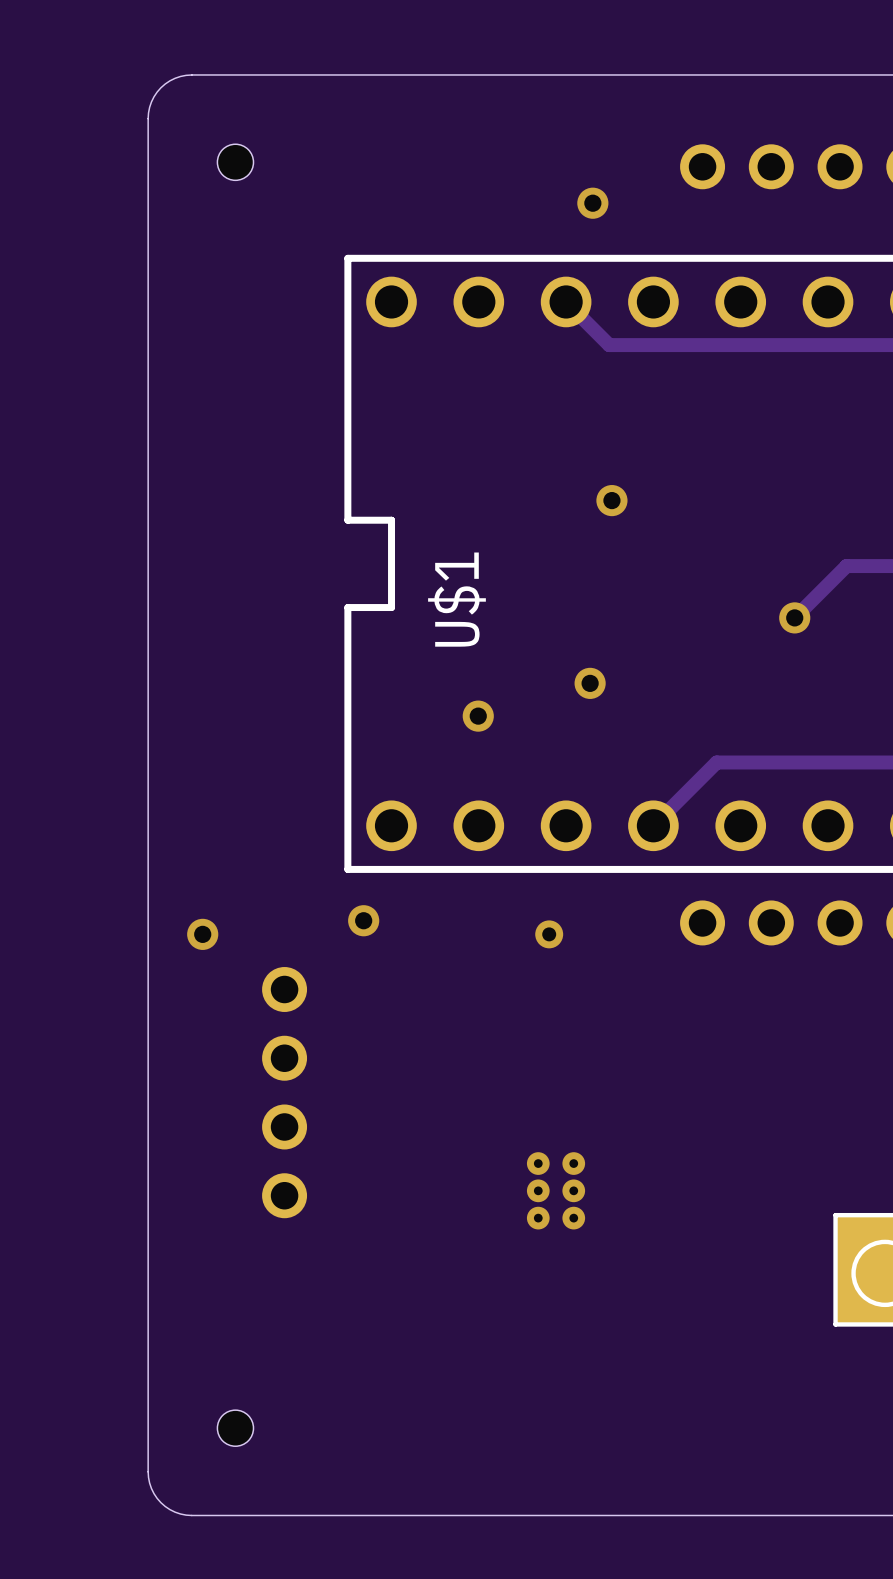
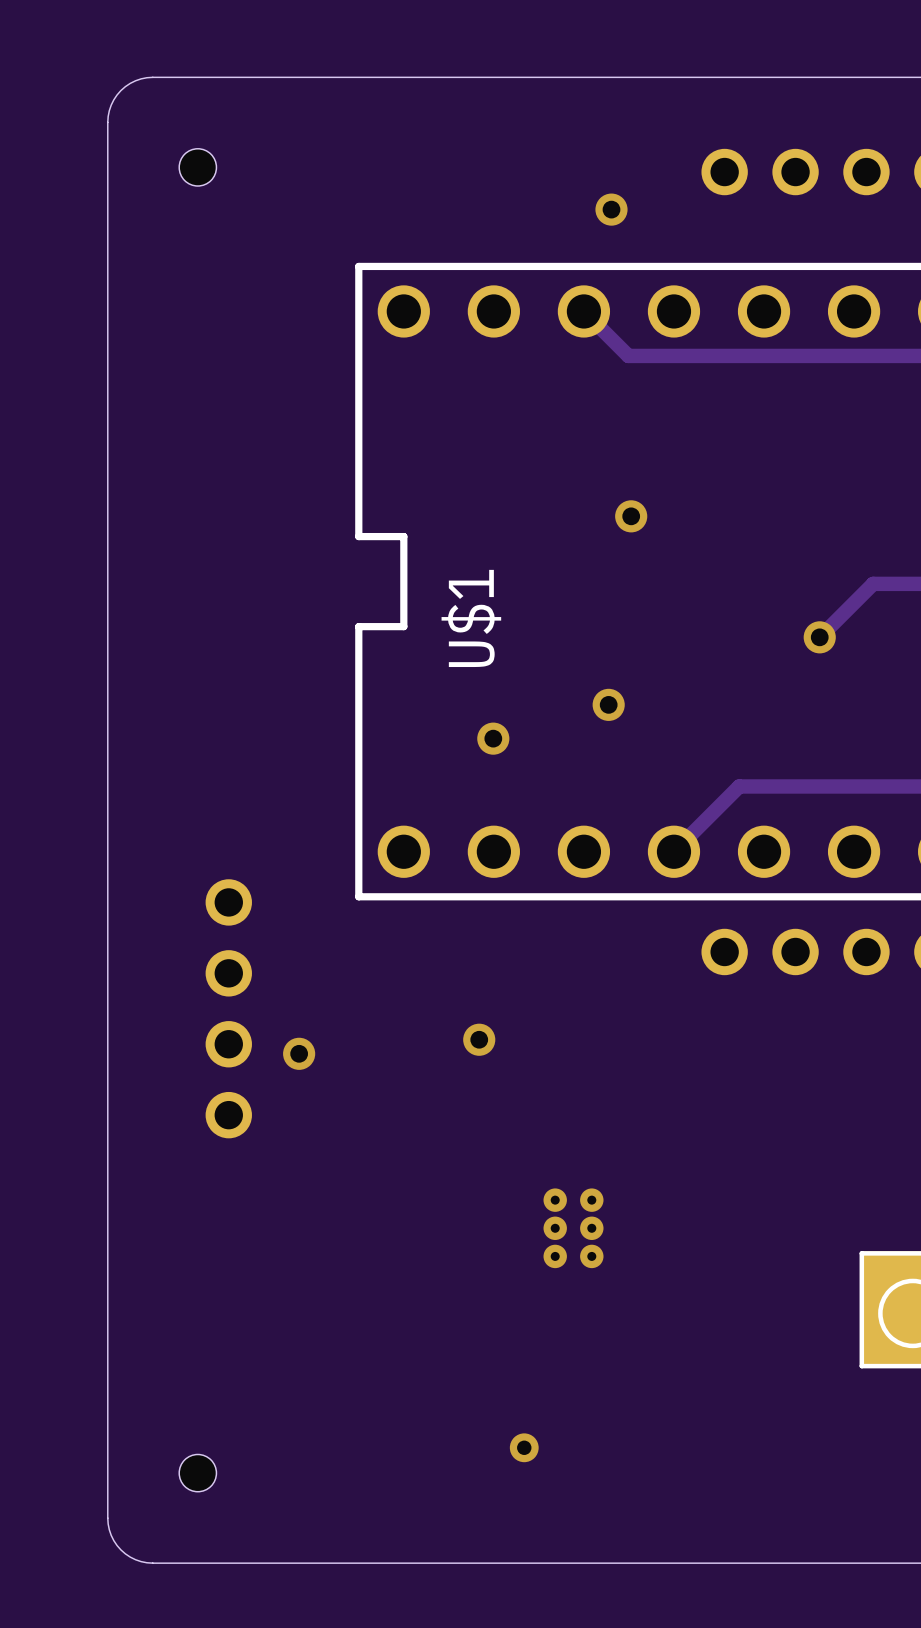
board edge: (191, 74) (175, 78) (160, 87) (151, 101) (148, 118) (148, 1471) (151, 1488) (160, 1502) (175, 1512) (191, 1515) -> (197, 77) (146, 77) (130, 83) (120, 90) (113, 99) (109, 110) (107, 122) (107, 1518) (109, 1529) (113, 1540) (120, 1549) (130, 1557) (146, 1562) (197, 1563)
hole position: (235, 162) -> (197, 167)
via: (363, 920) -> none
via: (202, 934) -> none
via: (549, 934) -> none
via: none -> (479, 1039)
via: none -> (299, 1053)
part position: (284, 1092) -> (228, 1008)
via: none -> (524, 1447)
hole position: (235, 1428) -> (197, 1473)

